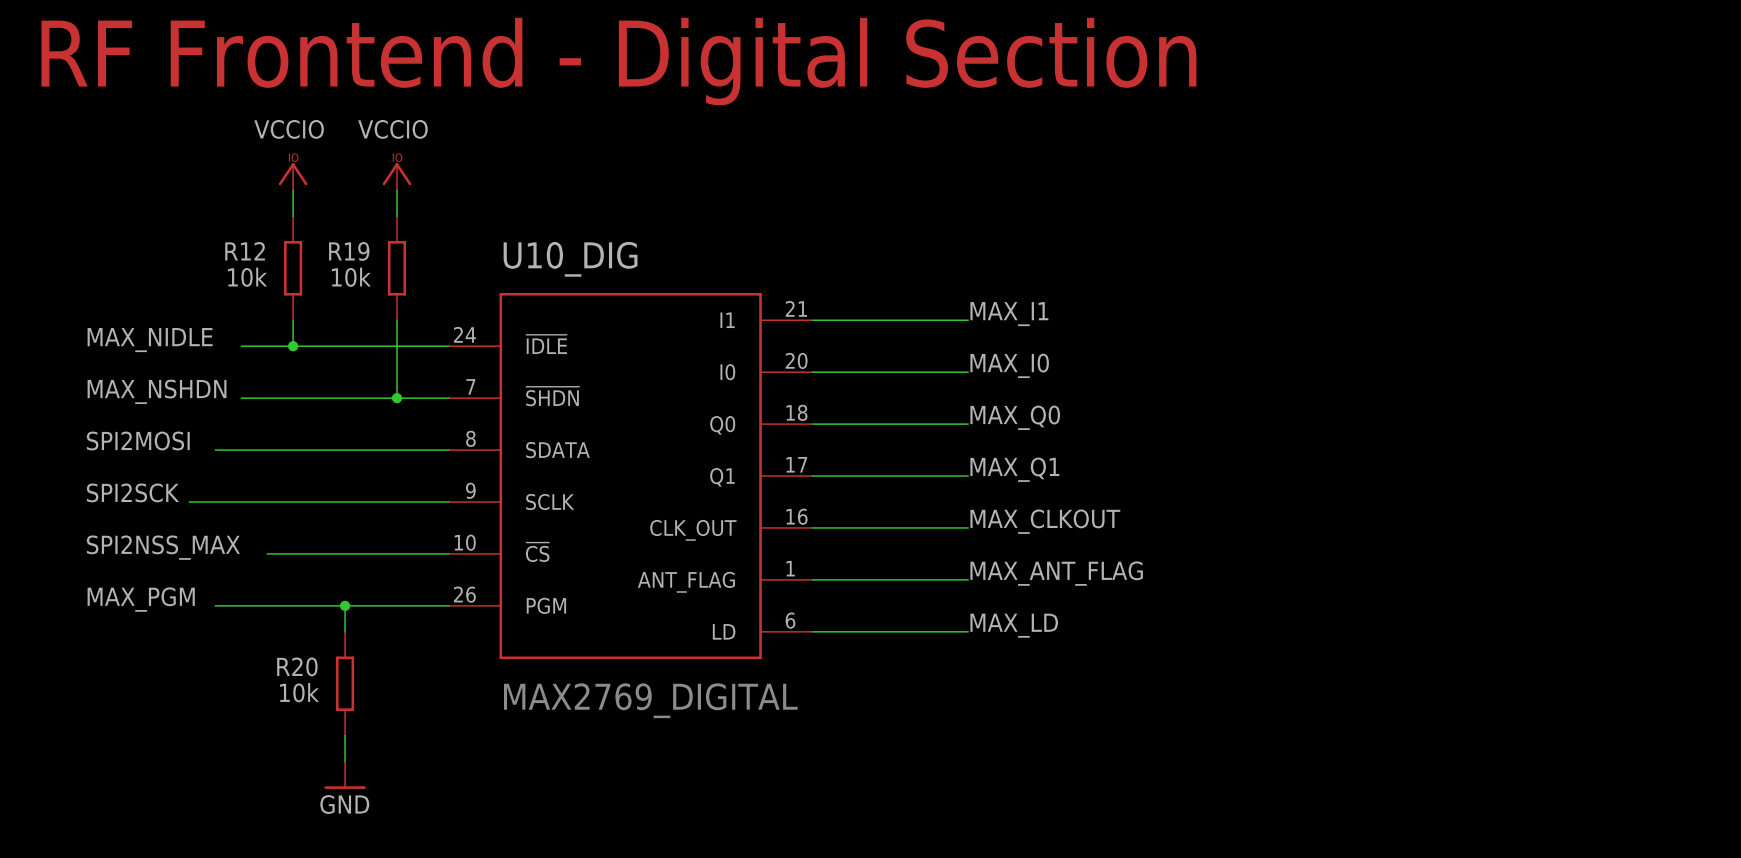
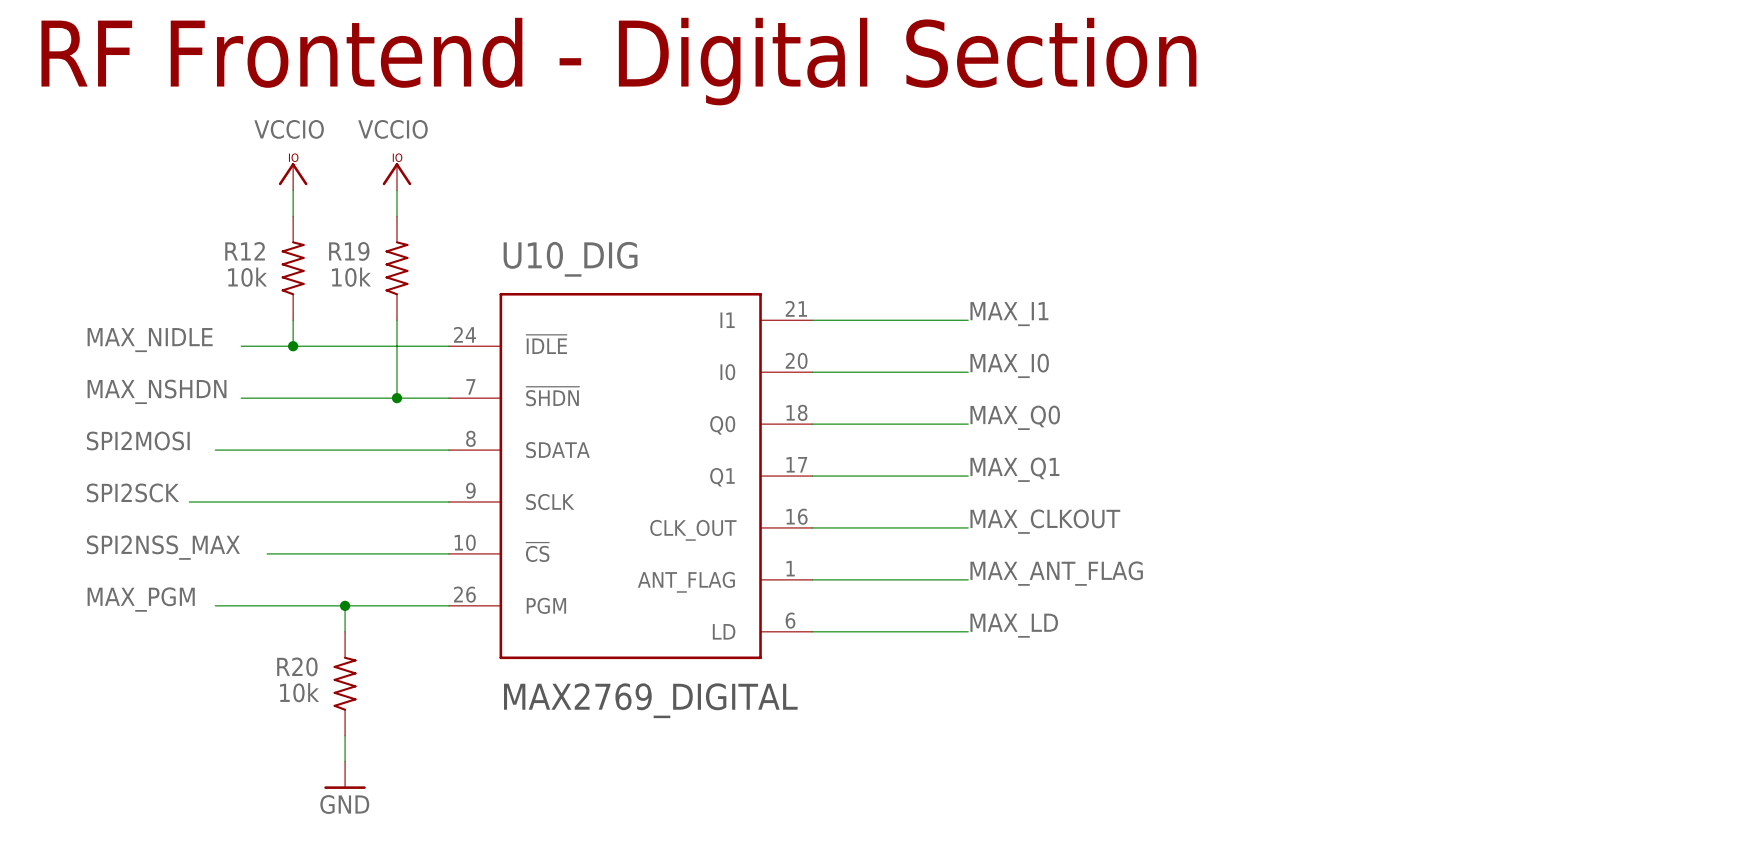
R12 symbol: [284, 216, 303, 321] -> [281, 216, 305, 321]
R19 symbol: [387, 216, 407, 321] -> [385, 216, 409, 321]
R20 symbol: [335, 631, 355, 736] -> [333, 631, 357, 736]

